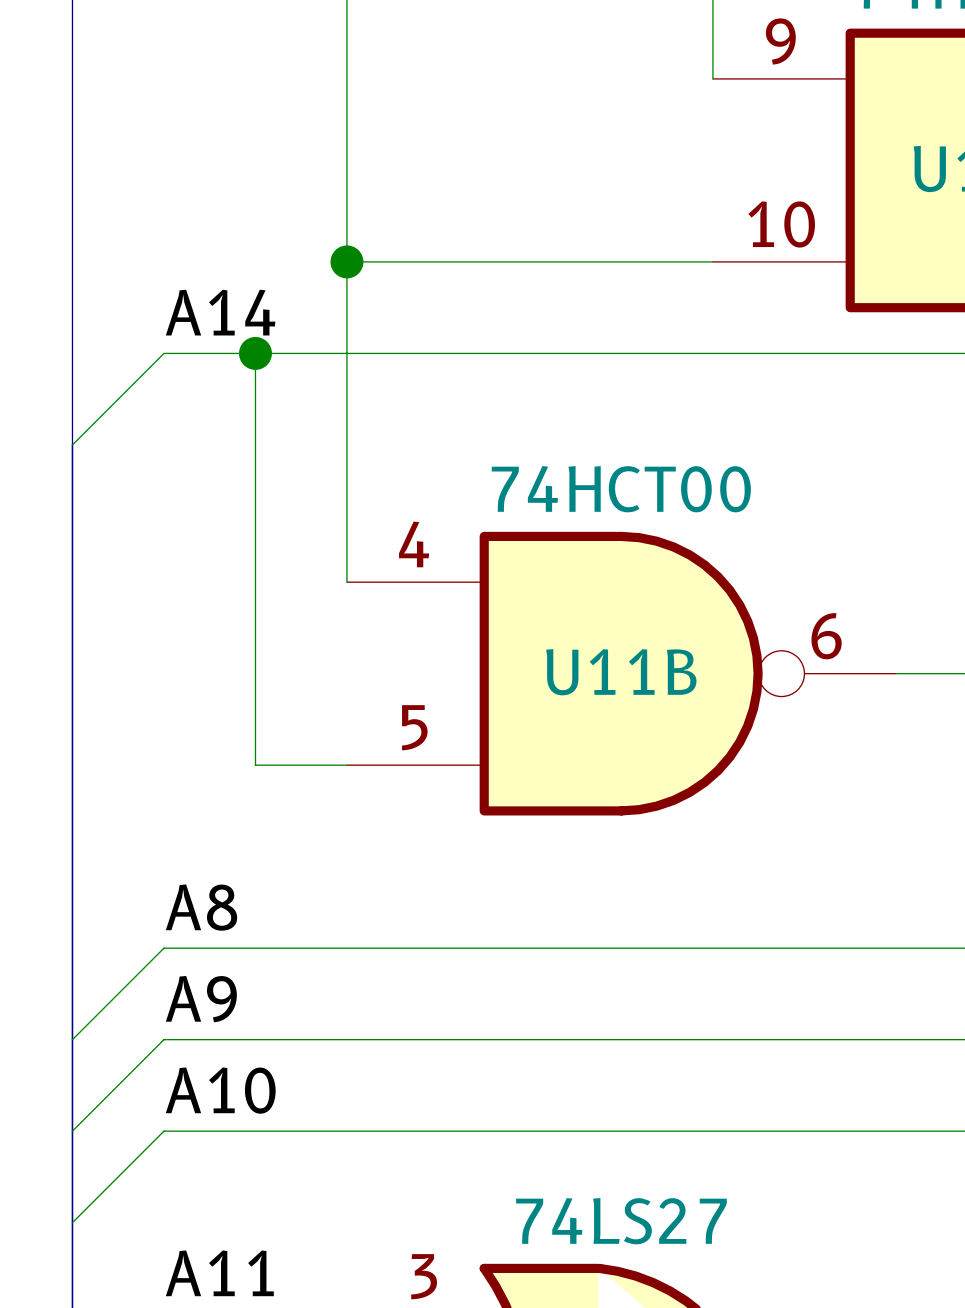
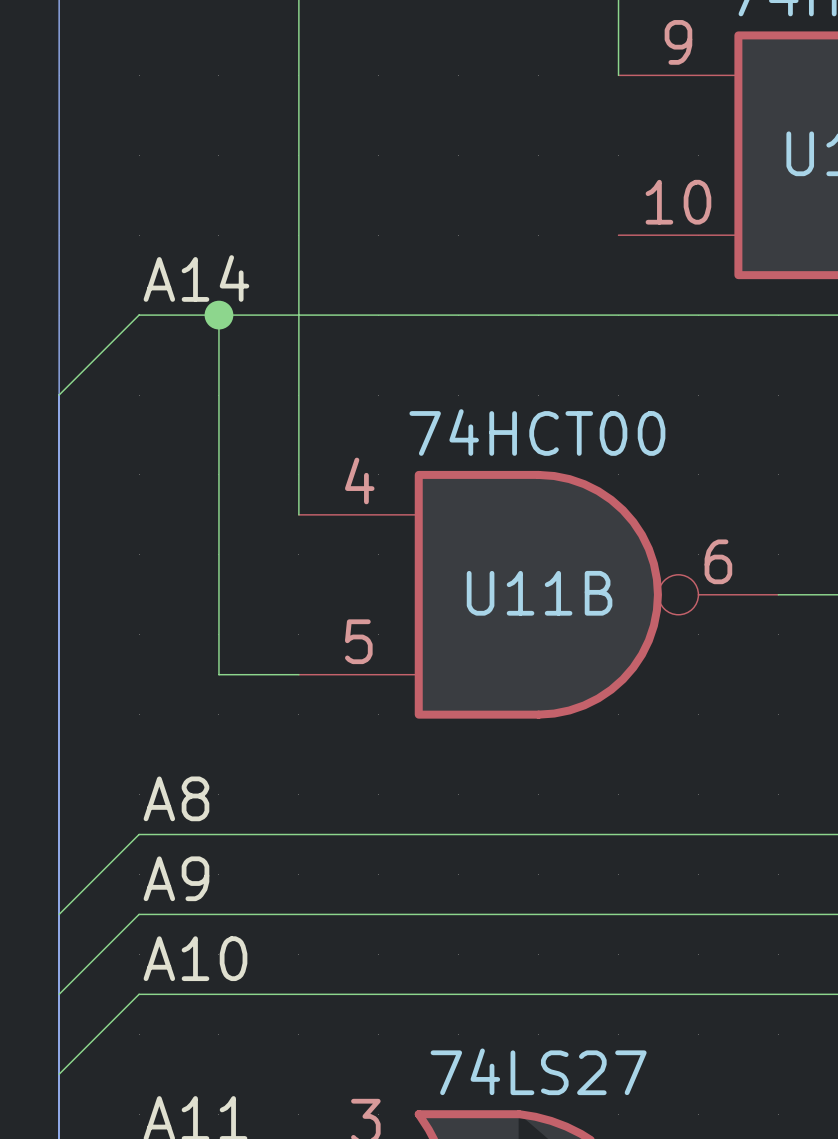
wire: (346, 261) (712, 261) -> none
junction: (346, 261) -> none

